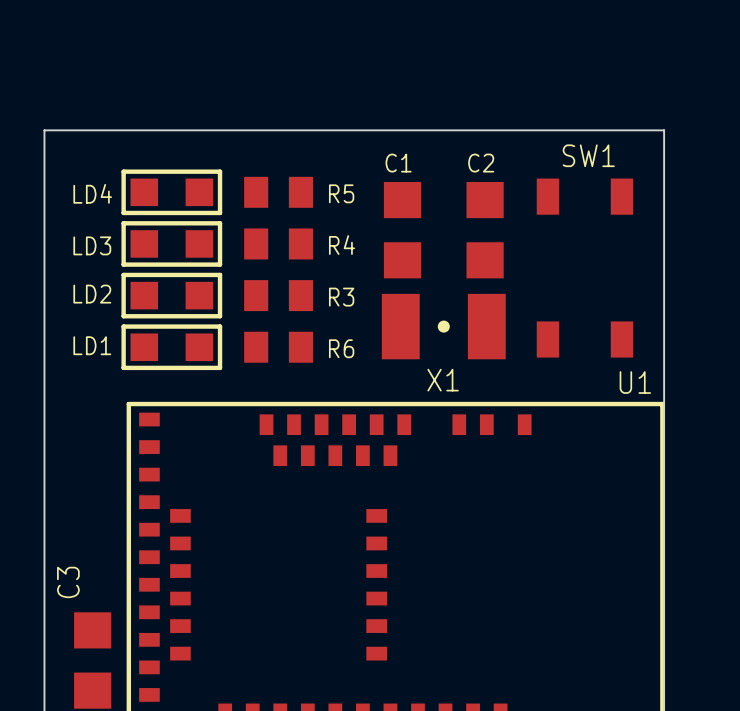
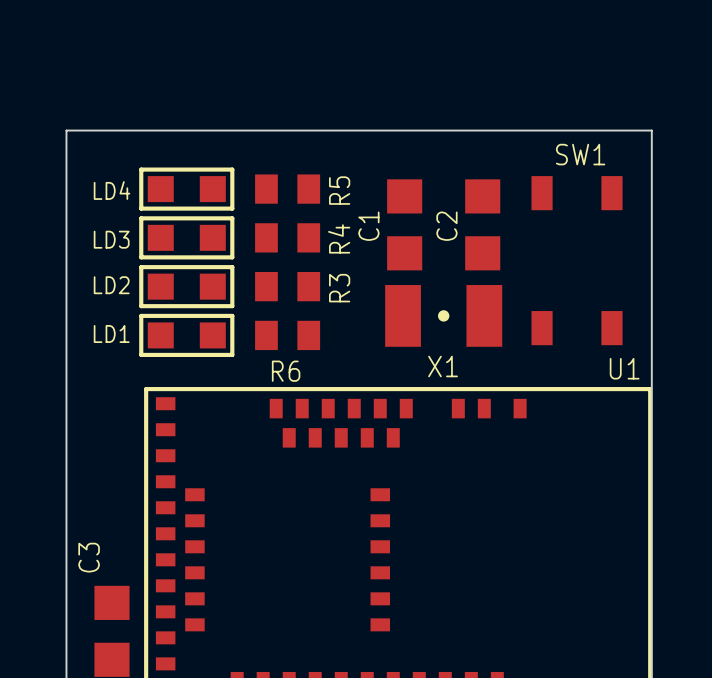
C1 name rotation: 0° (398, 163) -> 90° counterclockwise (368, 226)
C1 name position: C1 (398, 163) -> C1 (368, 226)
C2 name rotation: 0° (481, 163) -> 90° counterclockwise (446, 226)
C2 name position: C2 (481, 163) -> C2 (446, 226)
R5 name rotation: 0° (341, 193) -> 90° counterclockwise (339, 190)
R4 name rotation: 0° (341, 245) -> 90° counterclockwise (339, 238)
R3 name rotation: 0° (341, 297) -> 90° counterclockwise (339, 288)
R6 name position: R6 (341, 348) -> R6 (286, 371)

